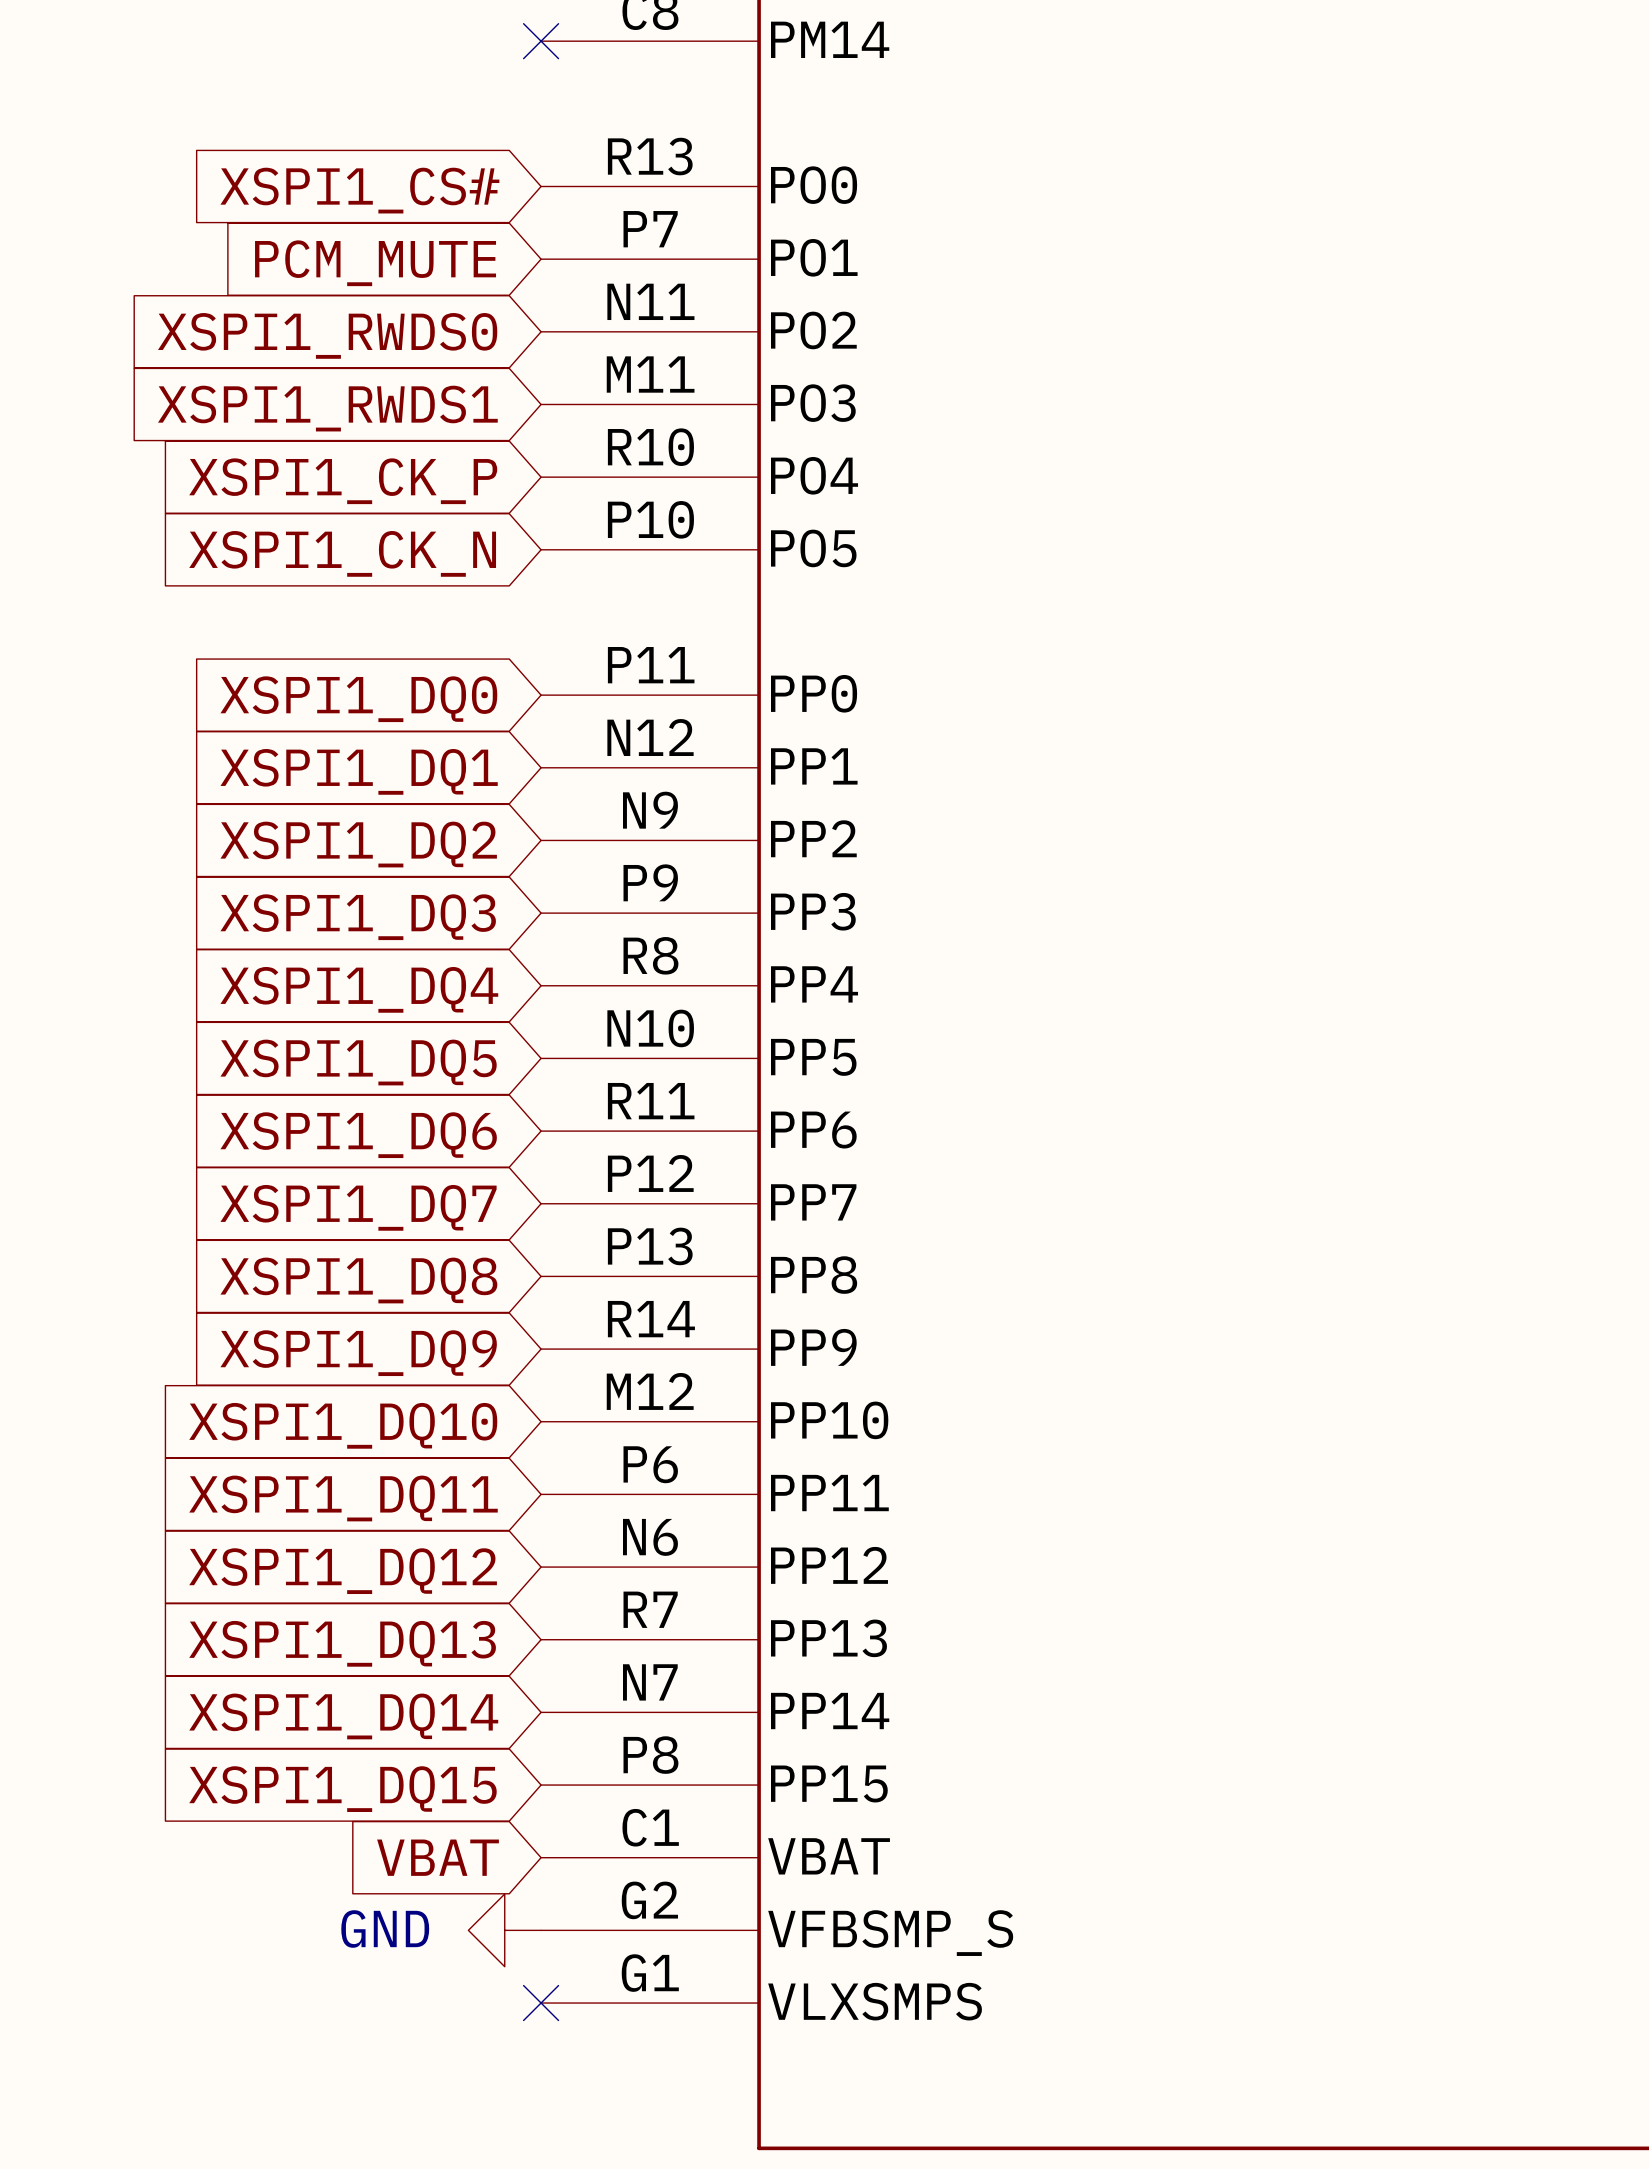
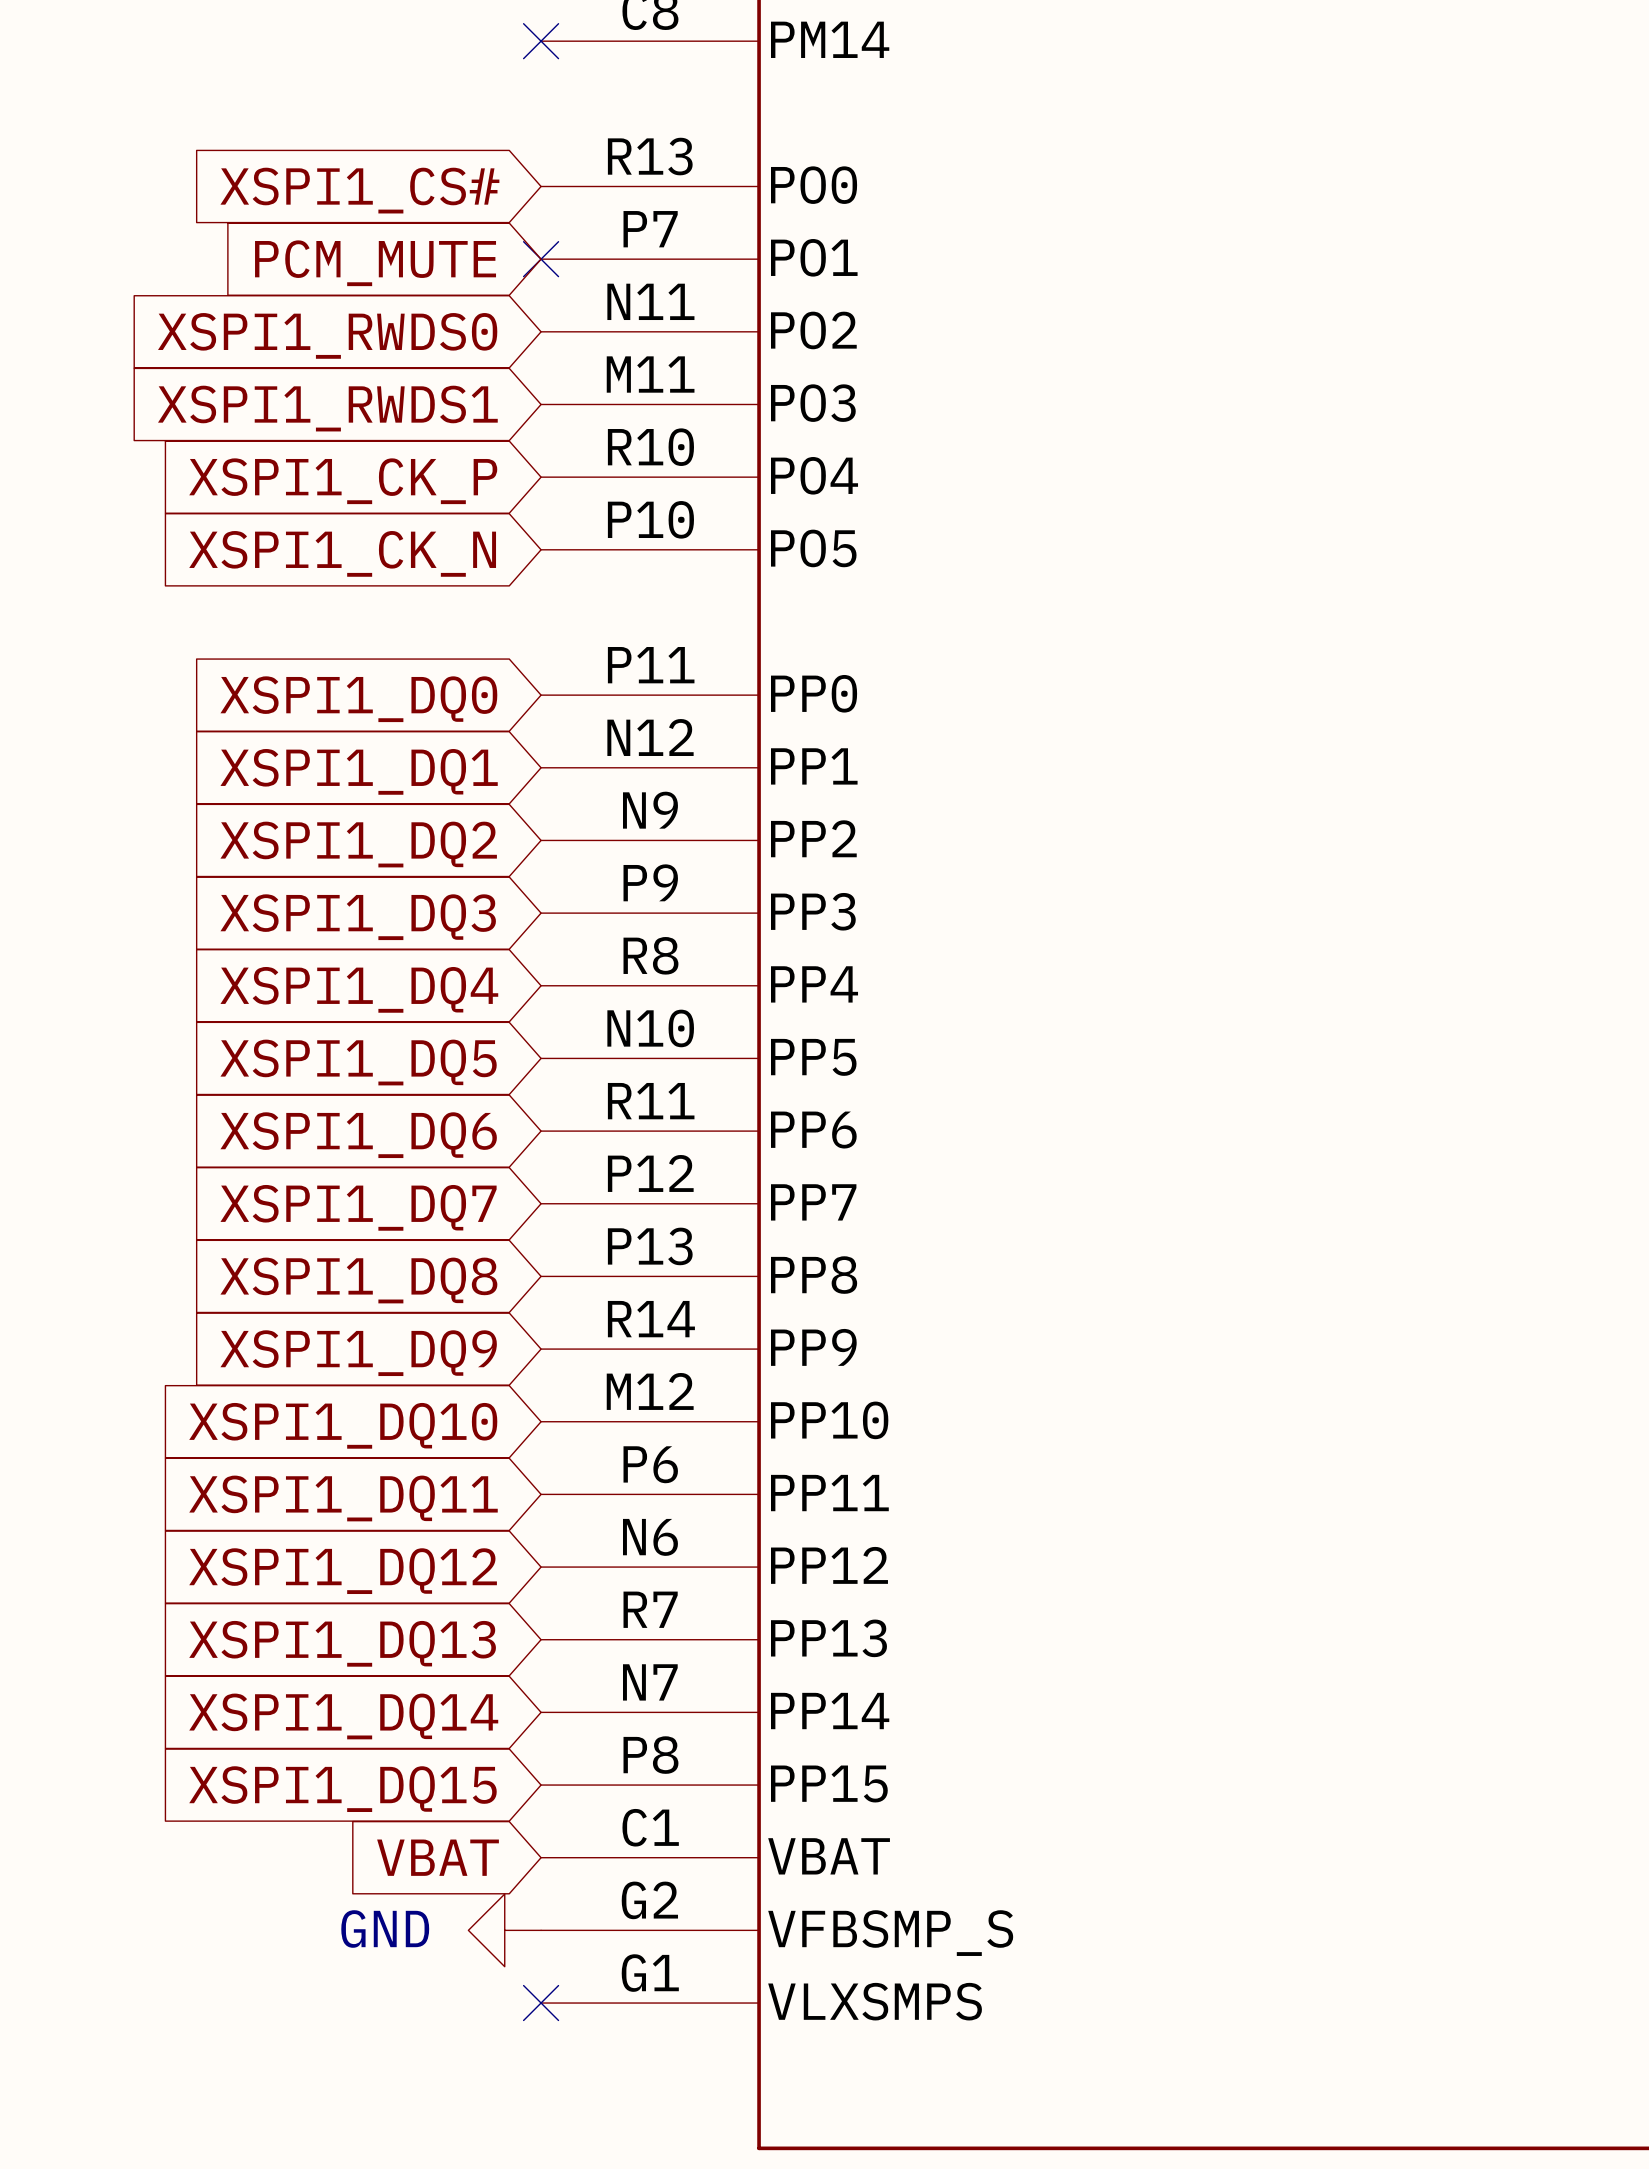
no-connect mark: none -> (541, 259)

